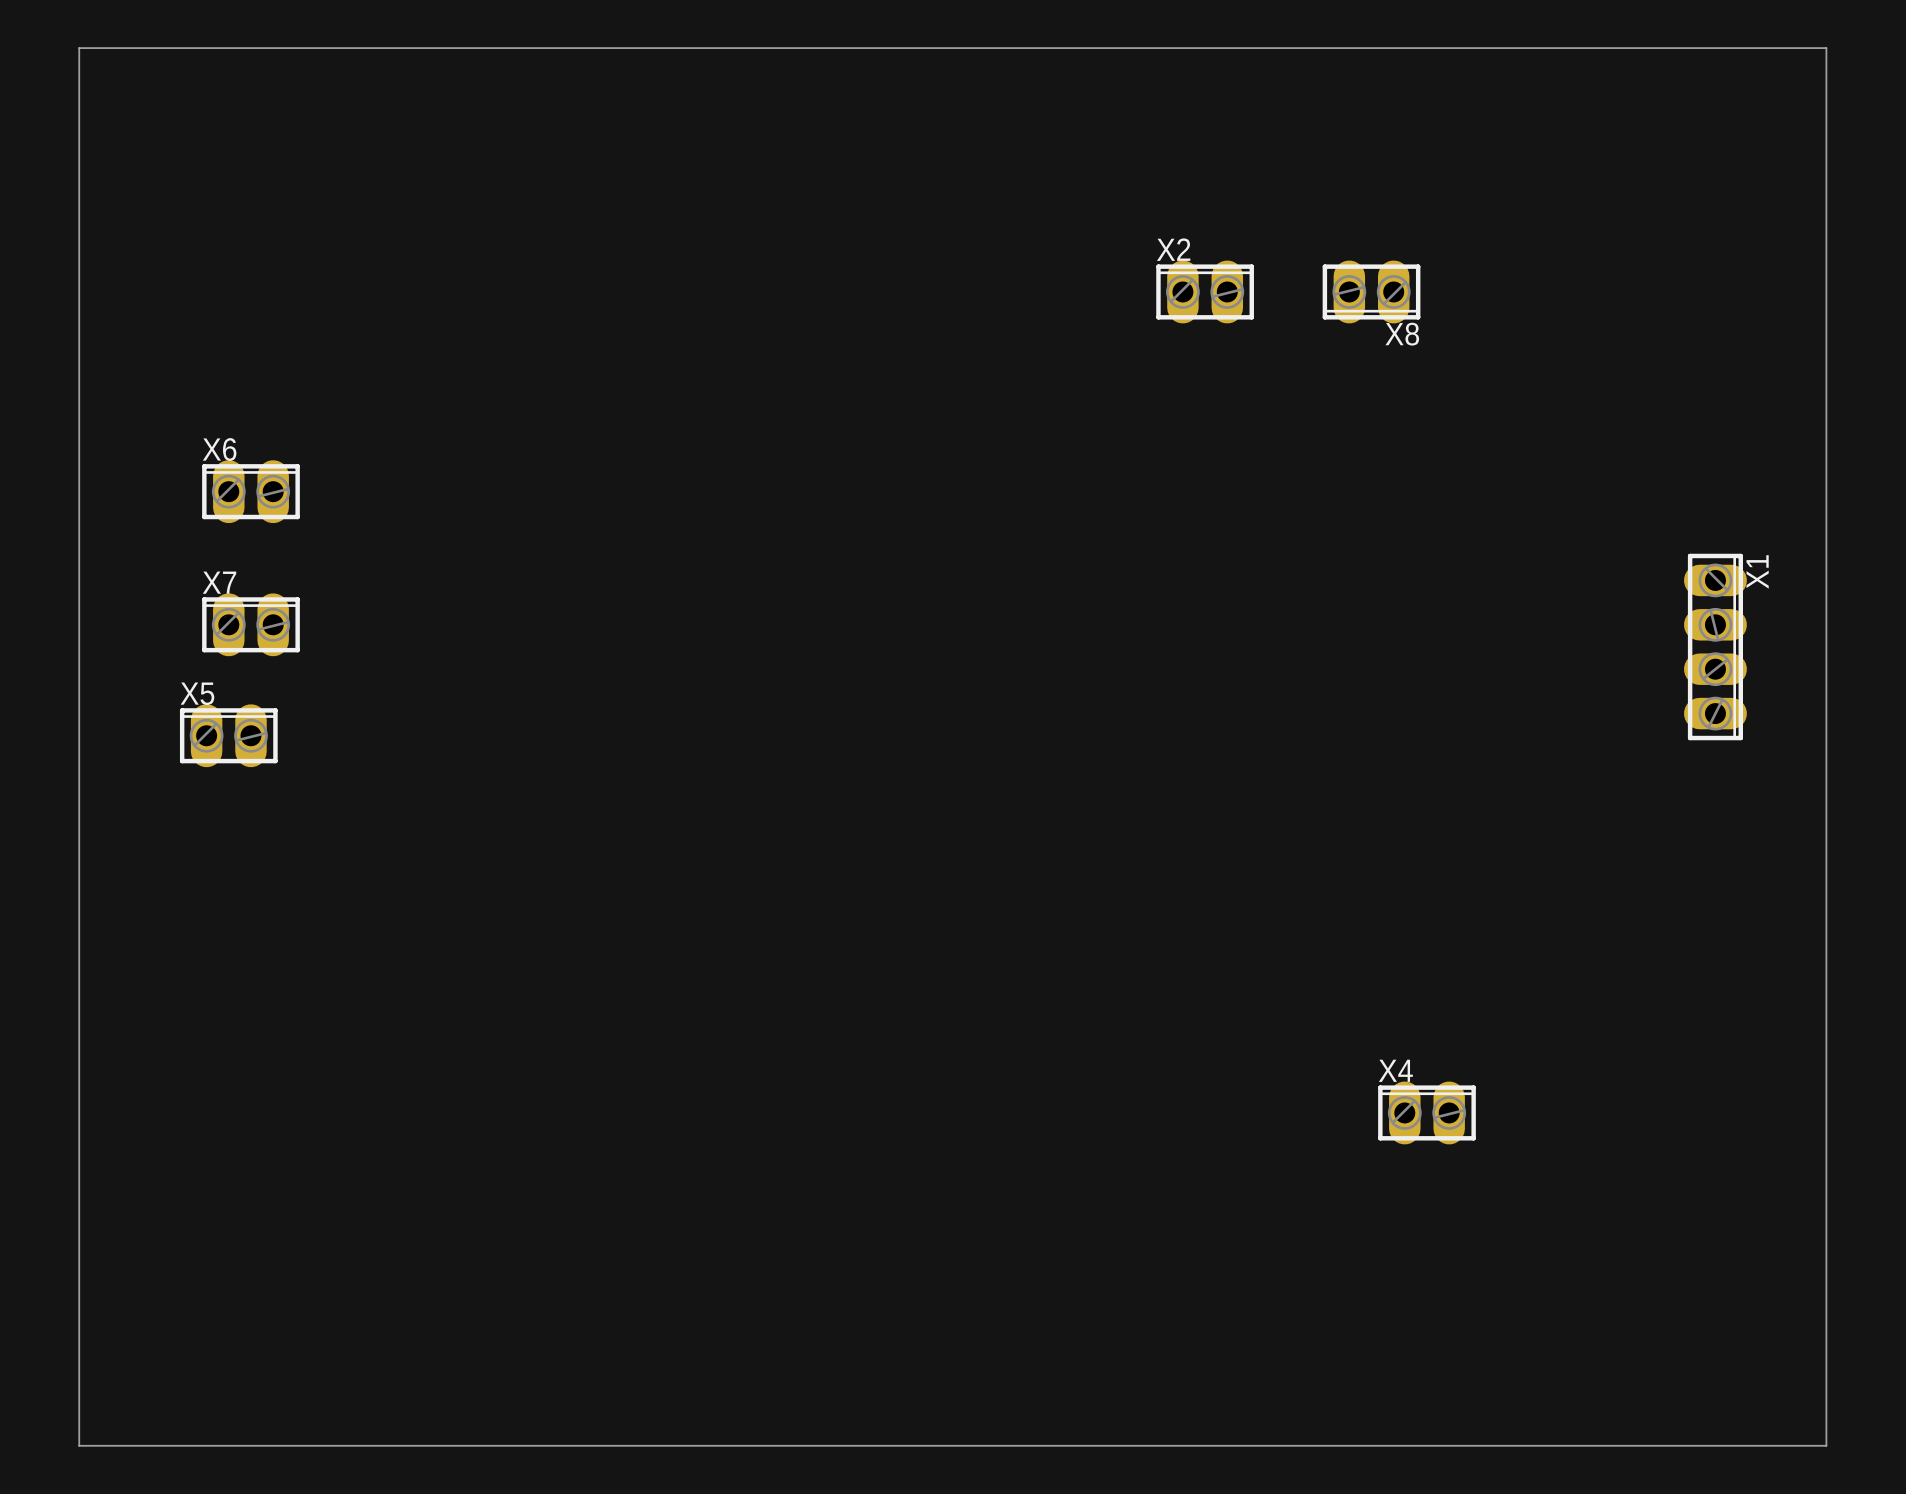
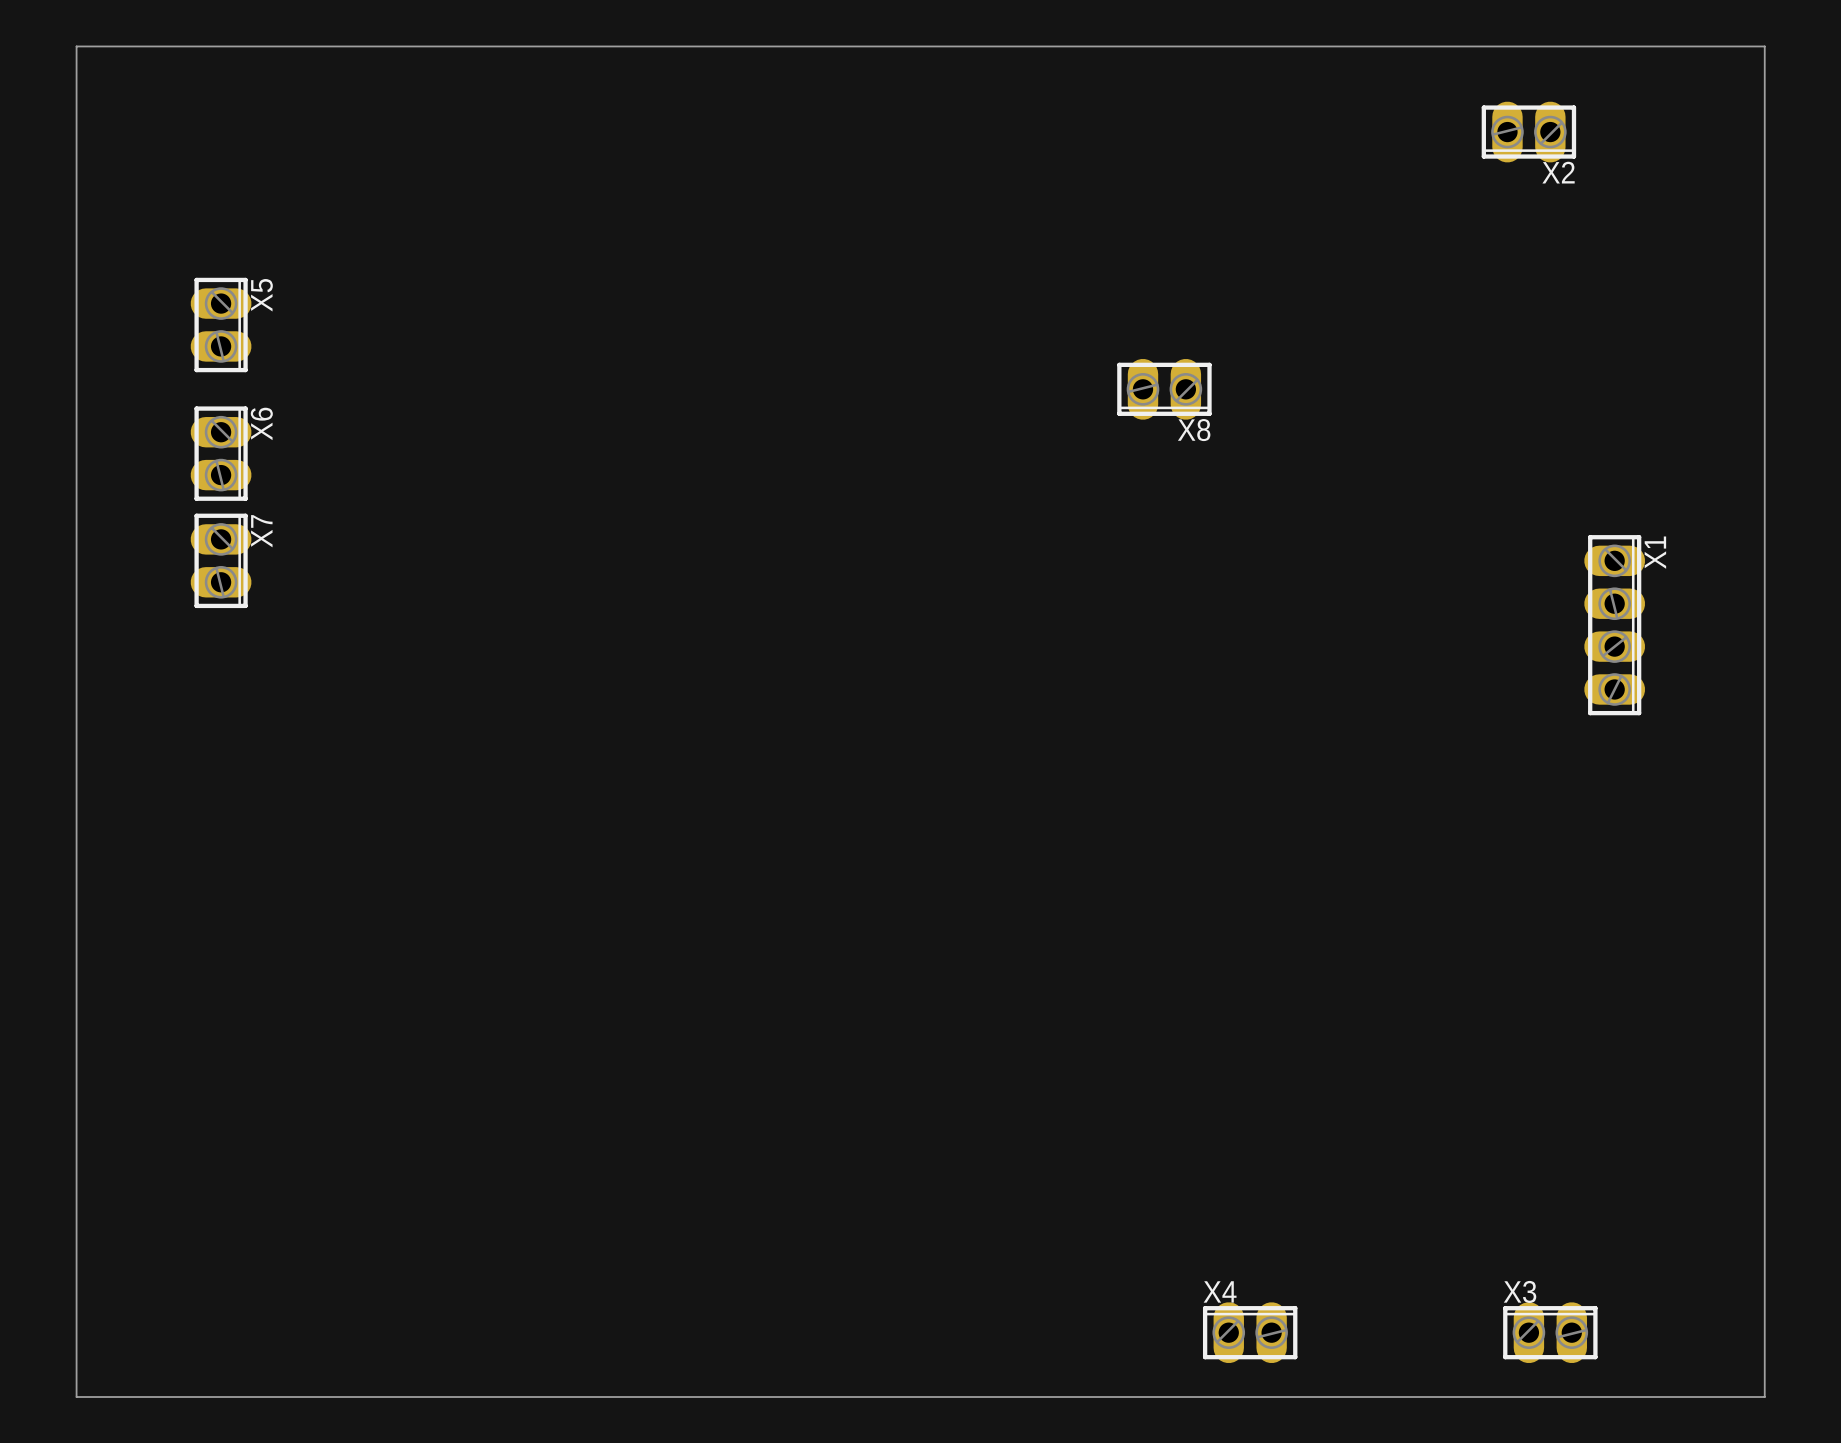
X2 rotation: 0° (1205, 291) -> 180° (1528, 132)
X2 position: (1205, 291) -> (1528, 132)
X8 position: (1371, 291) -> (1164, 389)
X6 rotation: 0° (250, 491) -> 90° clockwise (221, 453)
X7 rotation: 0° (250, 624) -> 90° clockwise (221, 560)
X1 position: (1715, 647) -> (1614, 625)
X5 rotation: 0° (228, 735) -> 90° clockwise (221, 325)
X5 position: (228, 735) -> (221, 325)
X4 position: (1426, 1112) -> (1250, 1332)
X3: none -> (1550, 1332)

